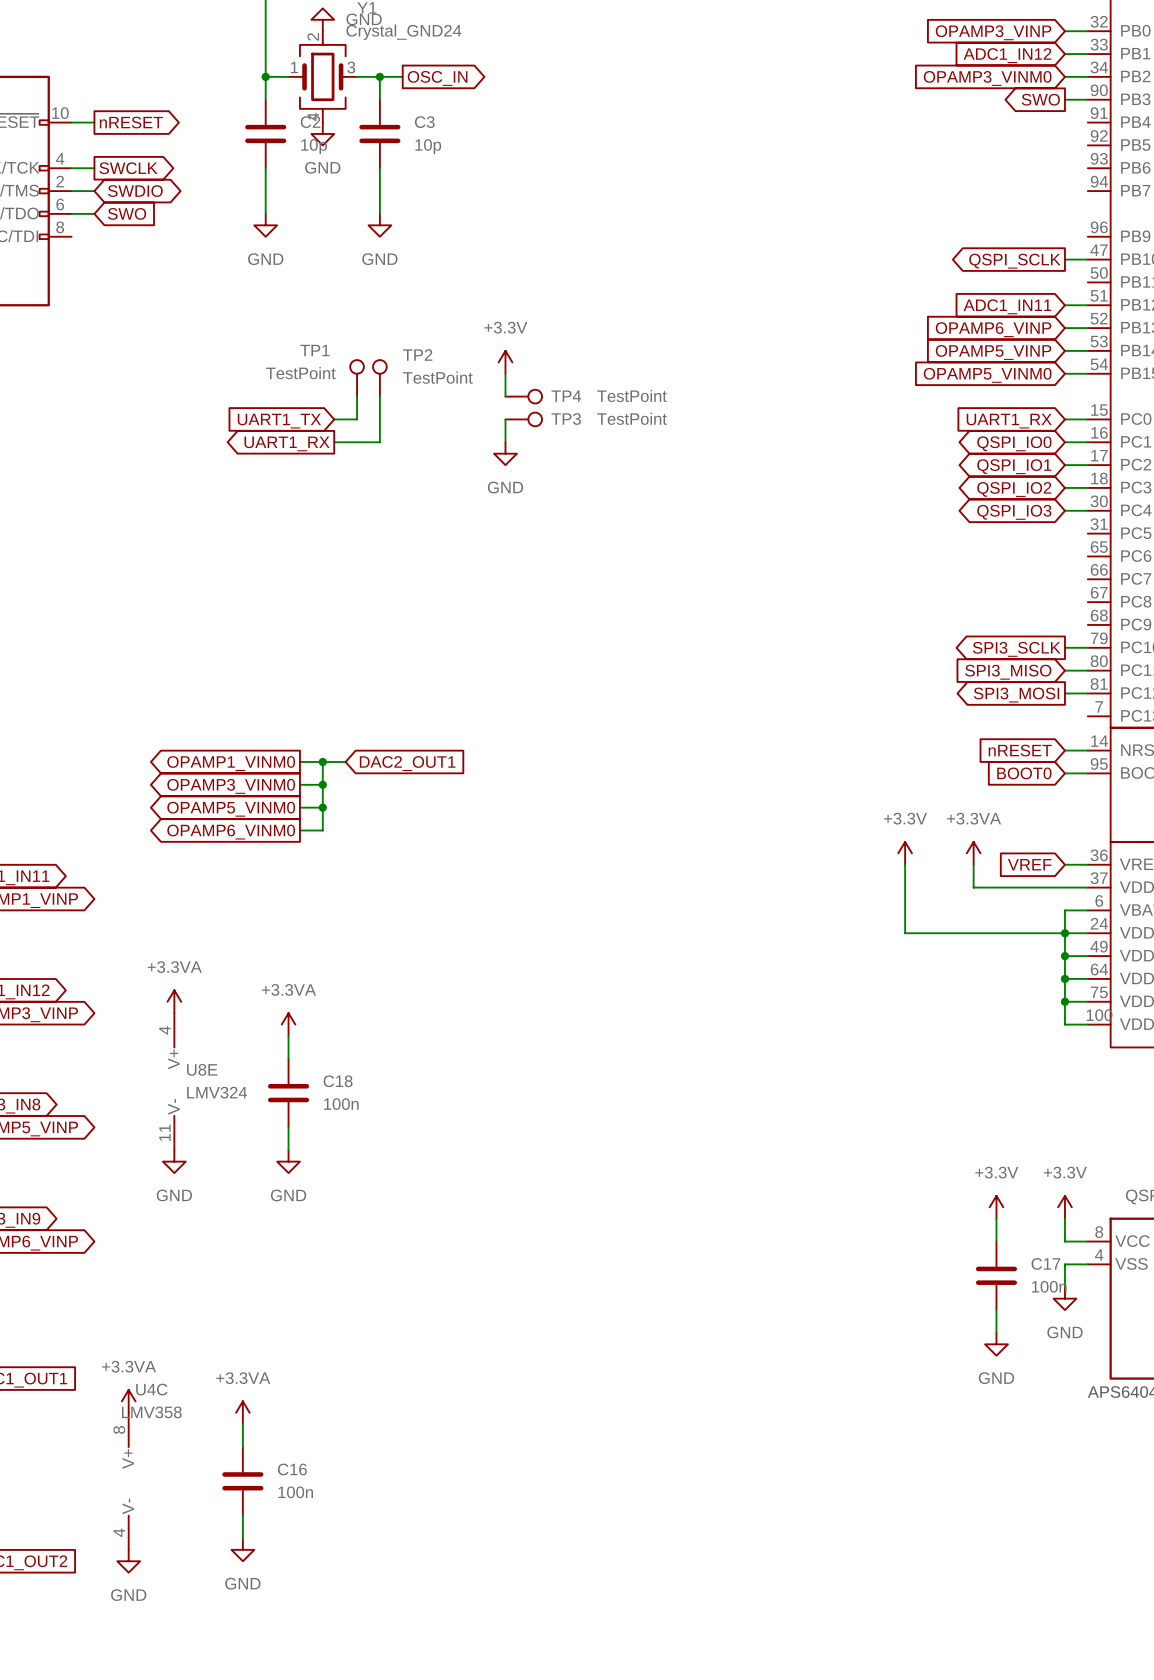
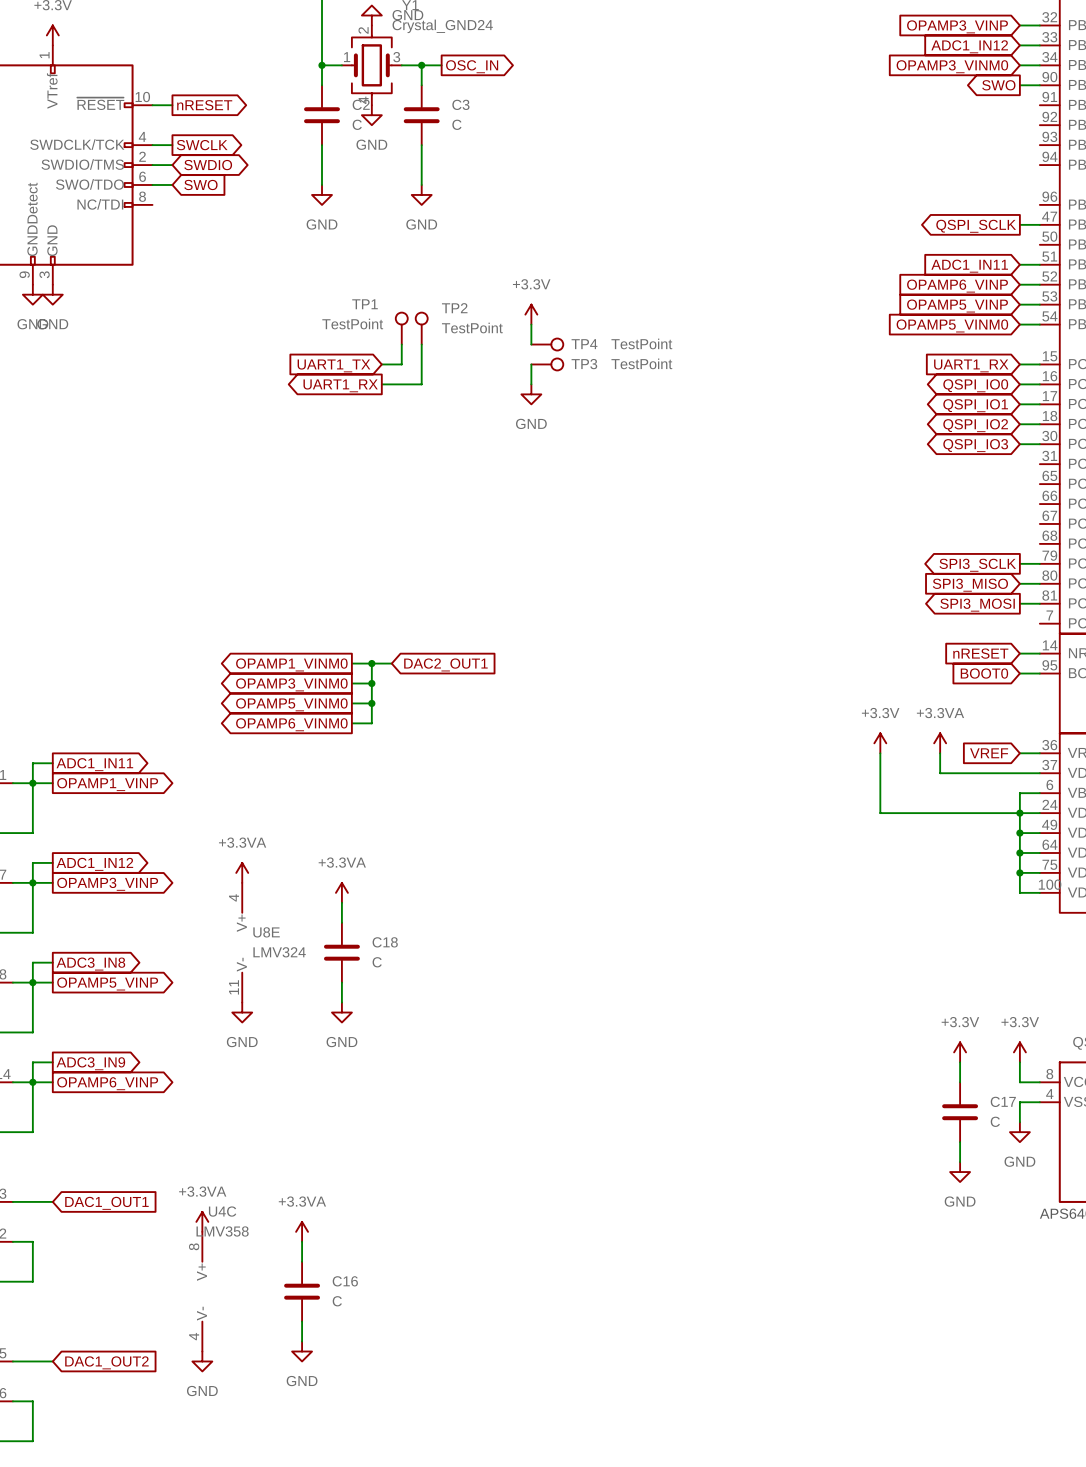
C2 value: 10p (314, 146) -> C (357, 124)
C3 value: 10p (428, 146) -> C (456, 124)
C18 value: 100n (341, 1104) -> C (377, 962)
C17 value: 100n (1049, 1286) -> C (995, 1121)
C16 value: 100n (295, 1492) -> C (337, 1301)

